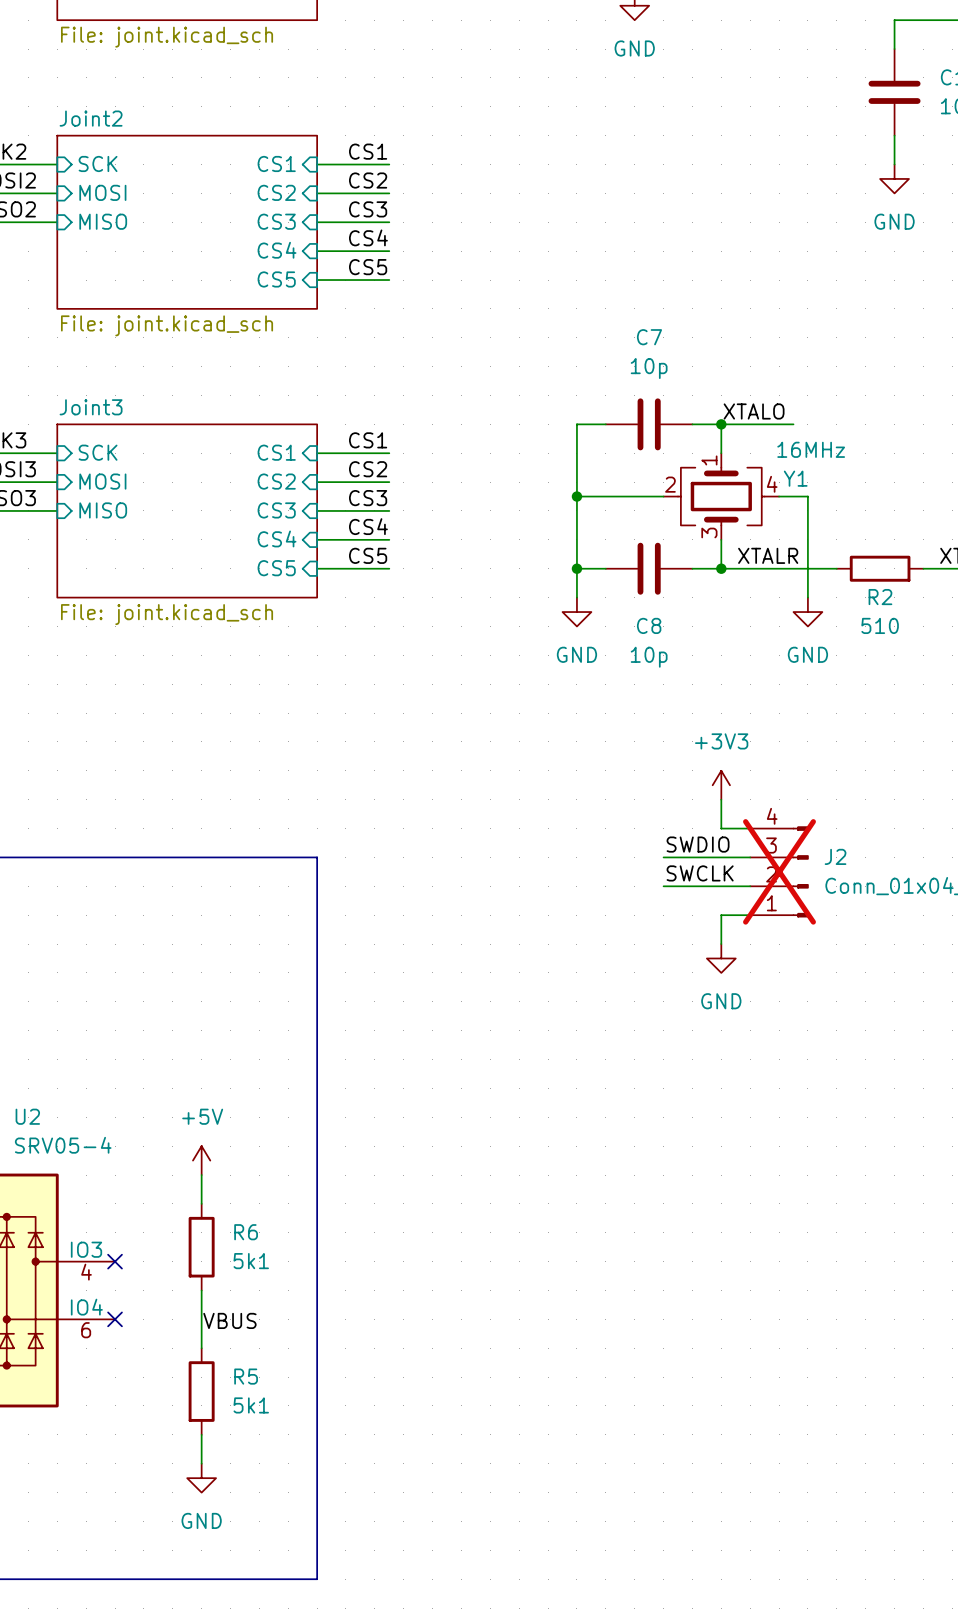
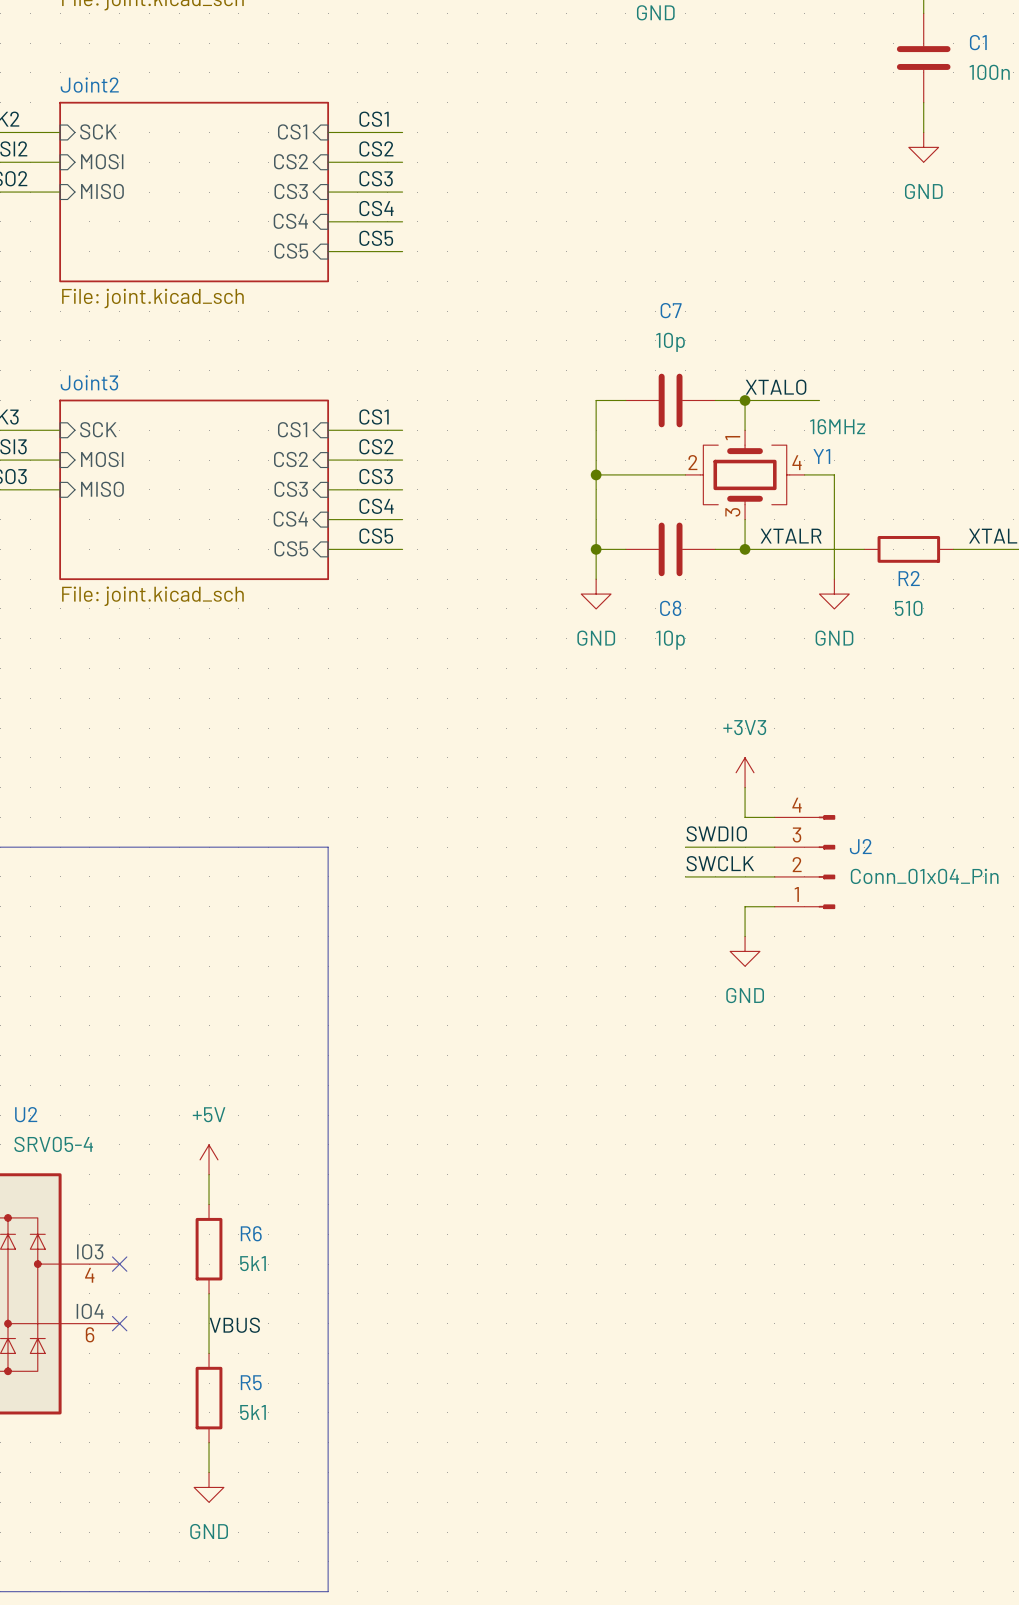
J2 do-not-place cross: (779, 871) -> none

